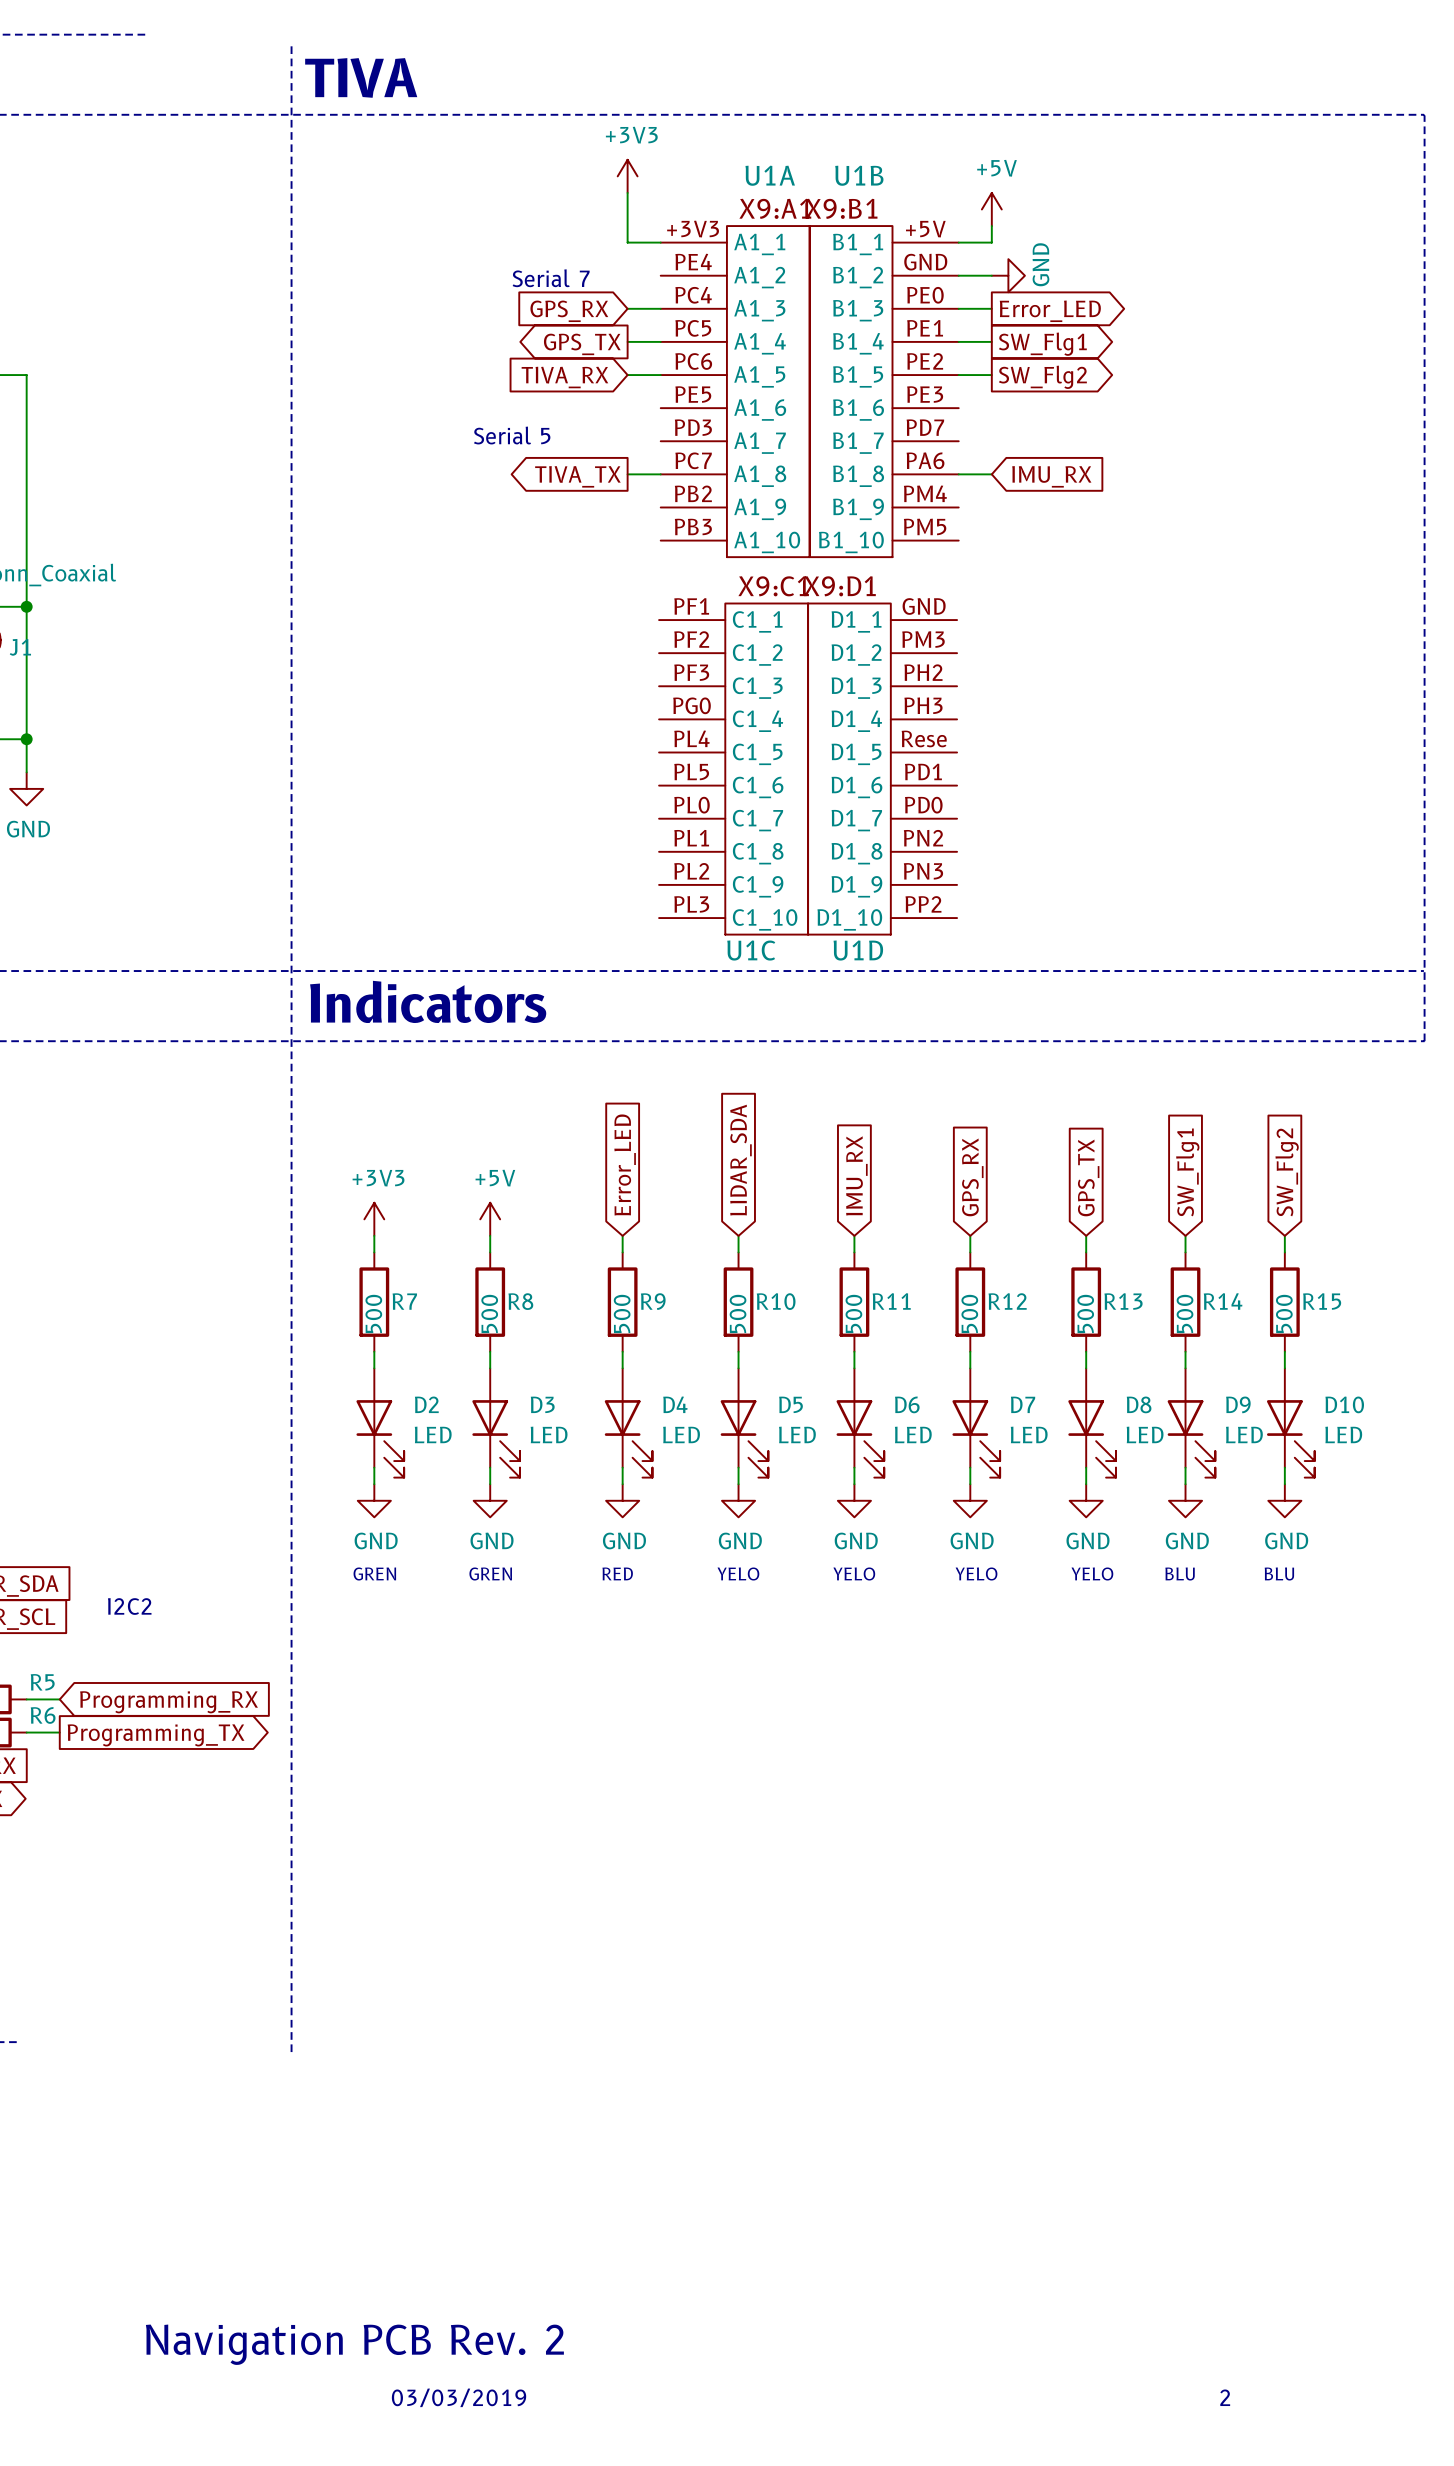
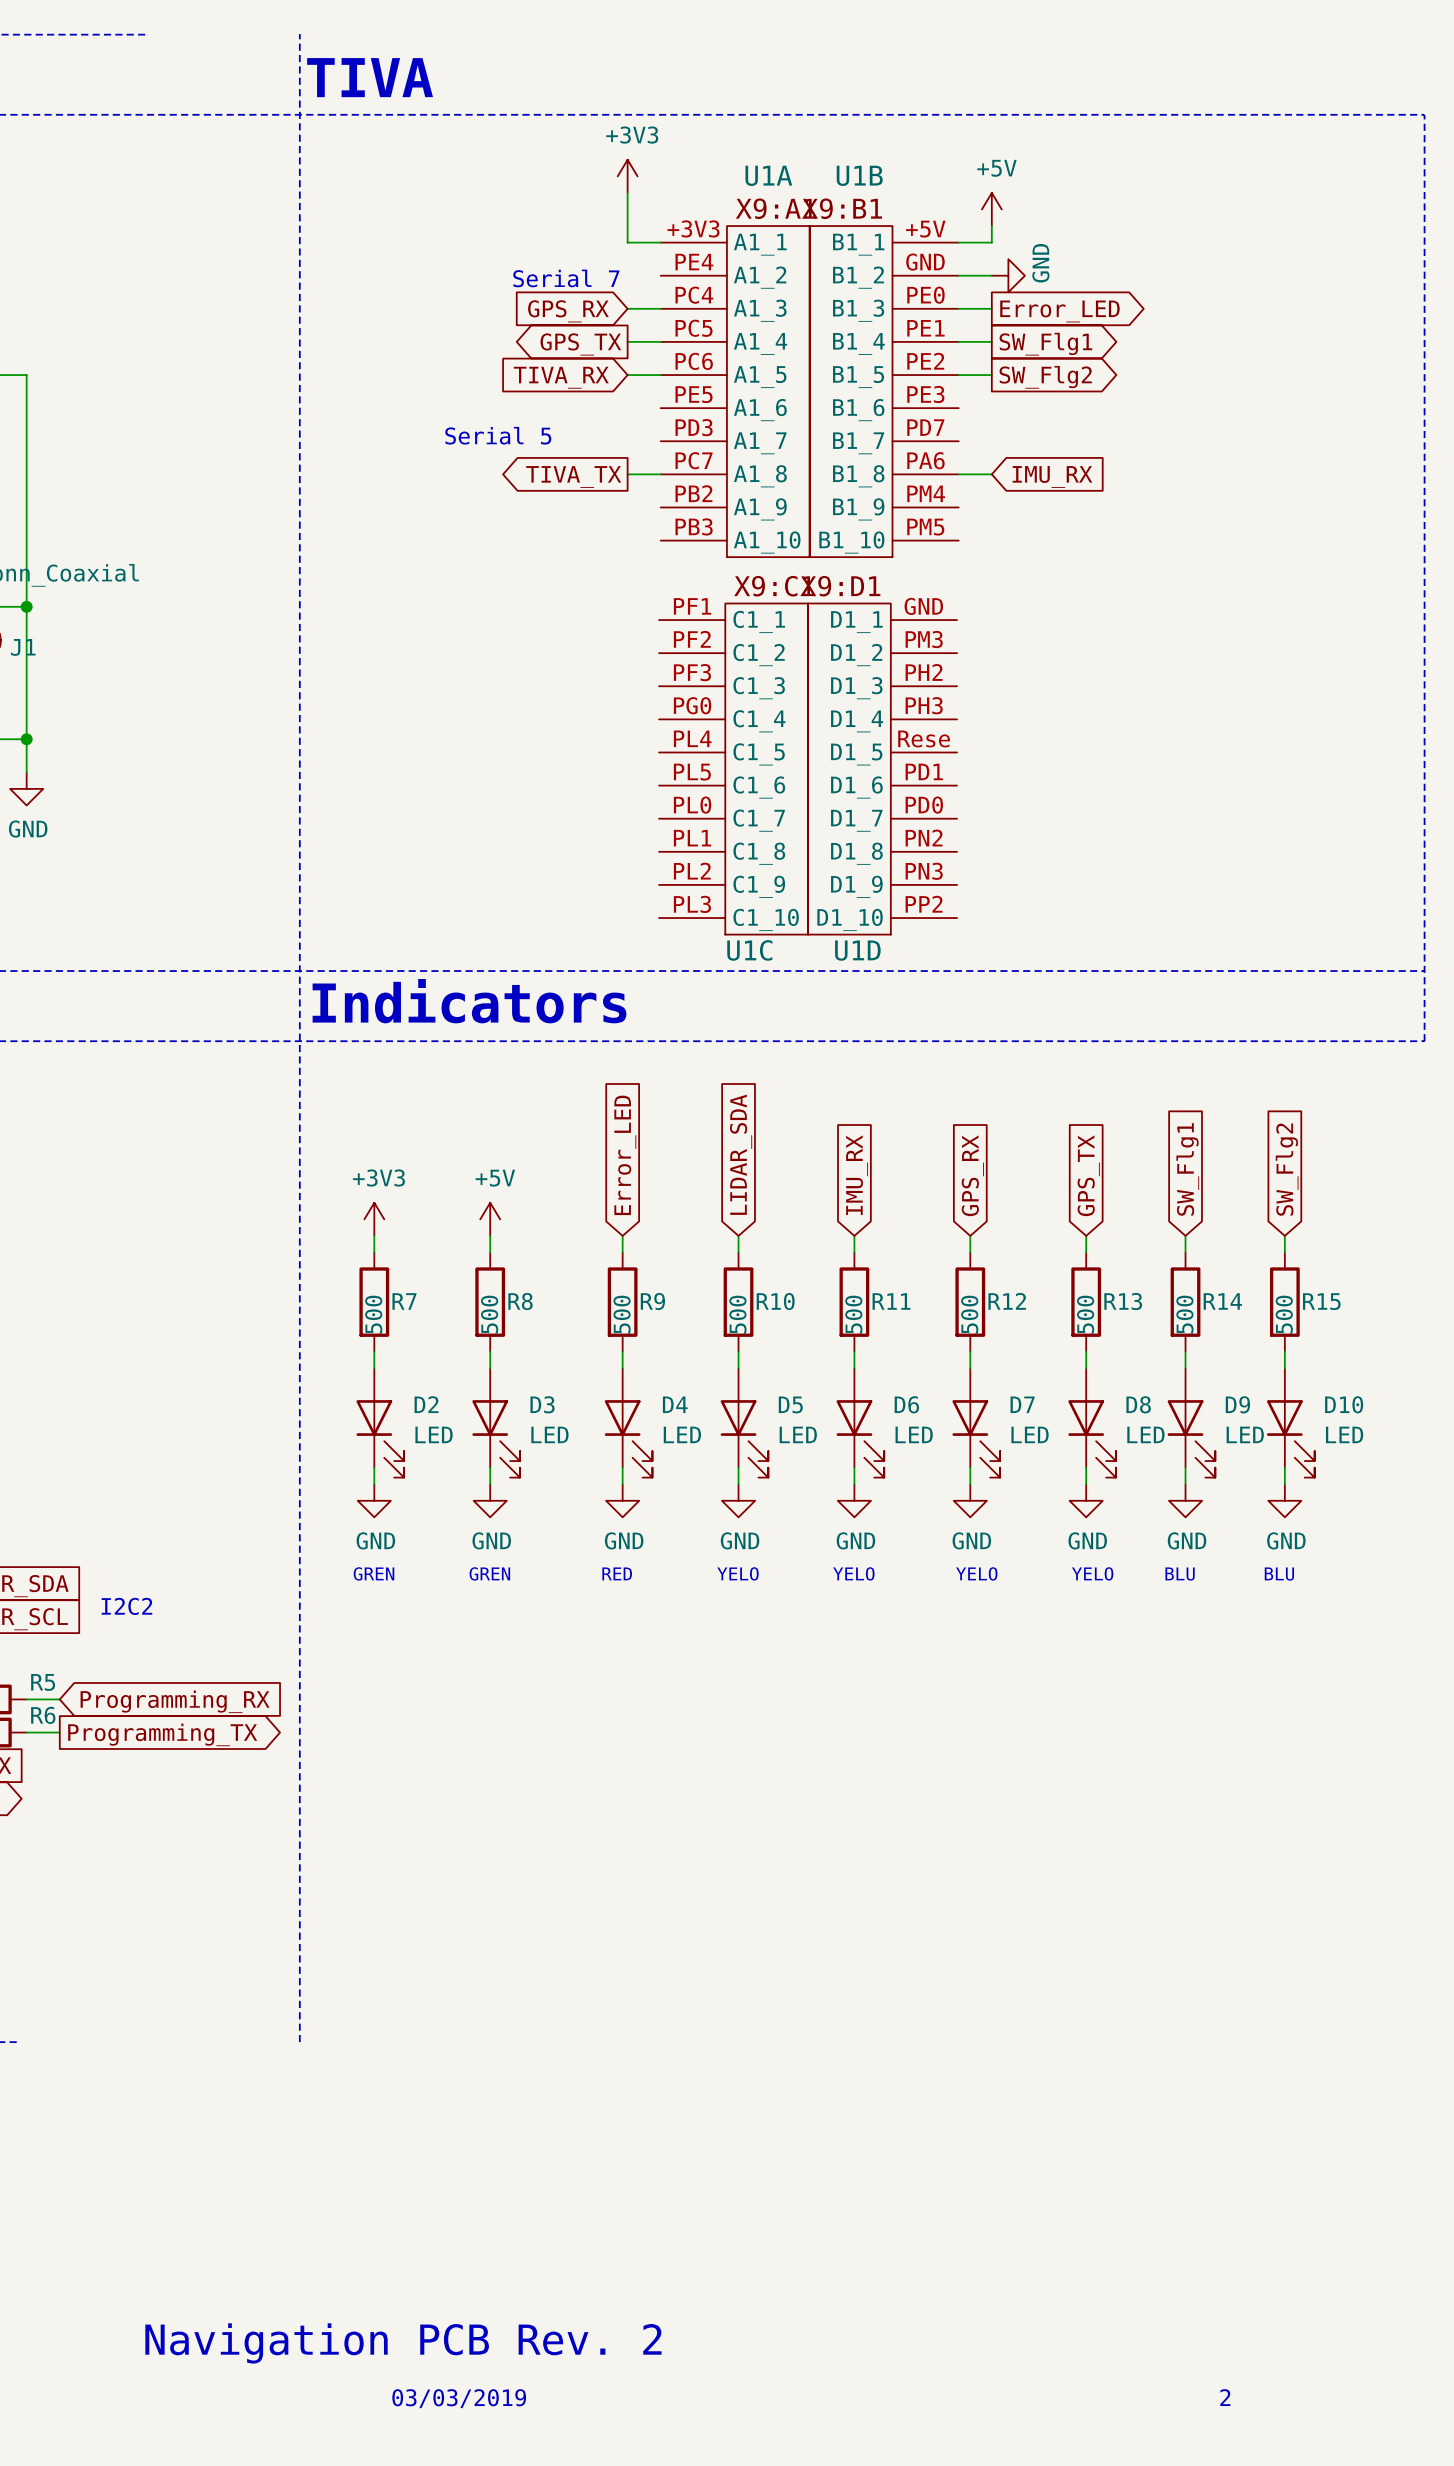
line: (291, 43) (291, 2052) -> (299, 34) (299, 2042)

